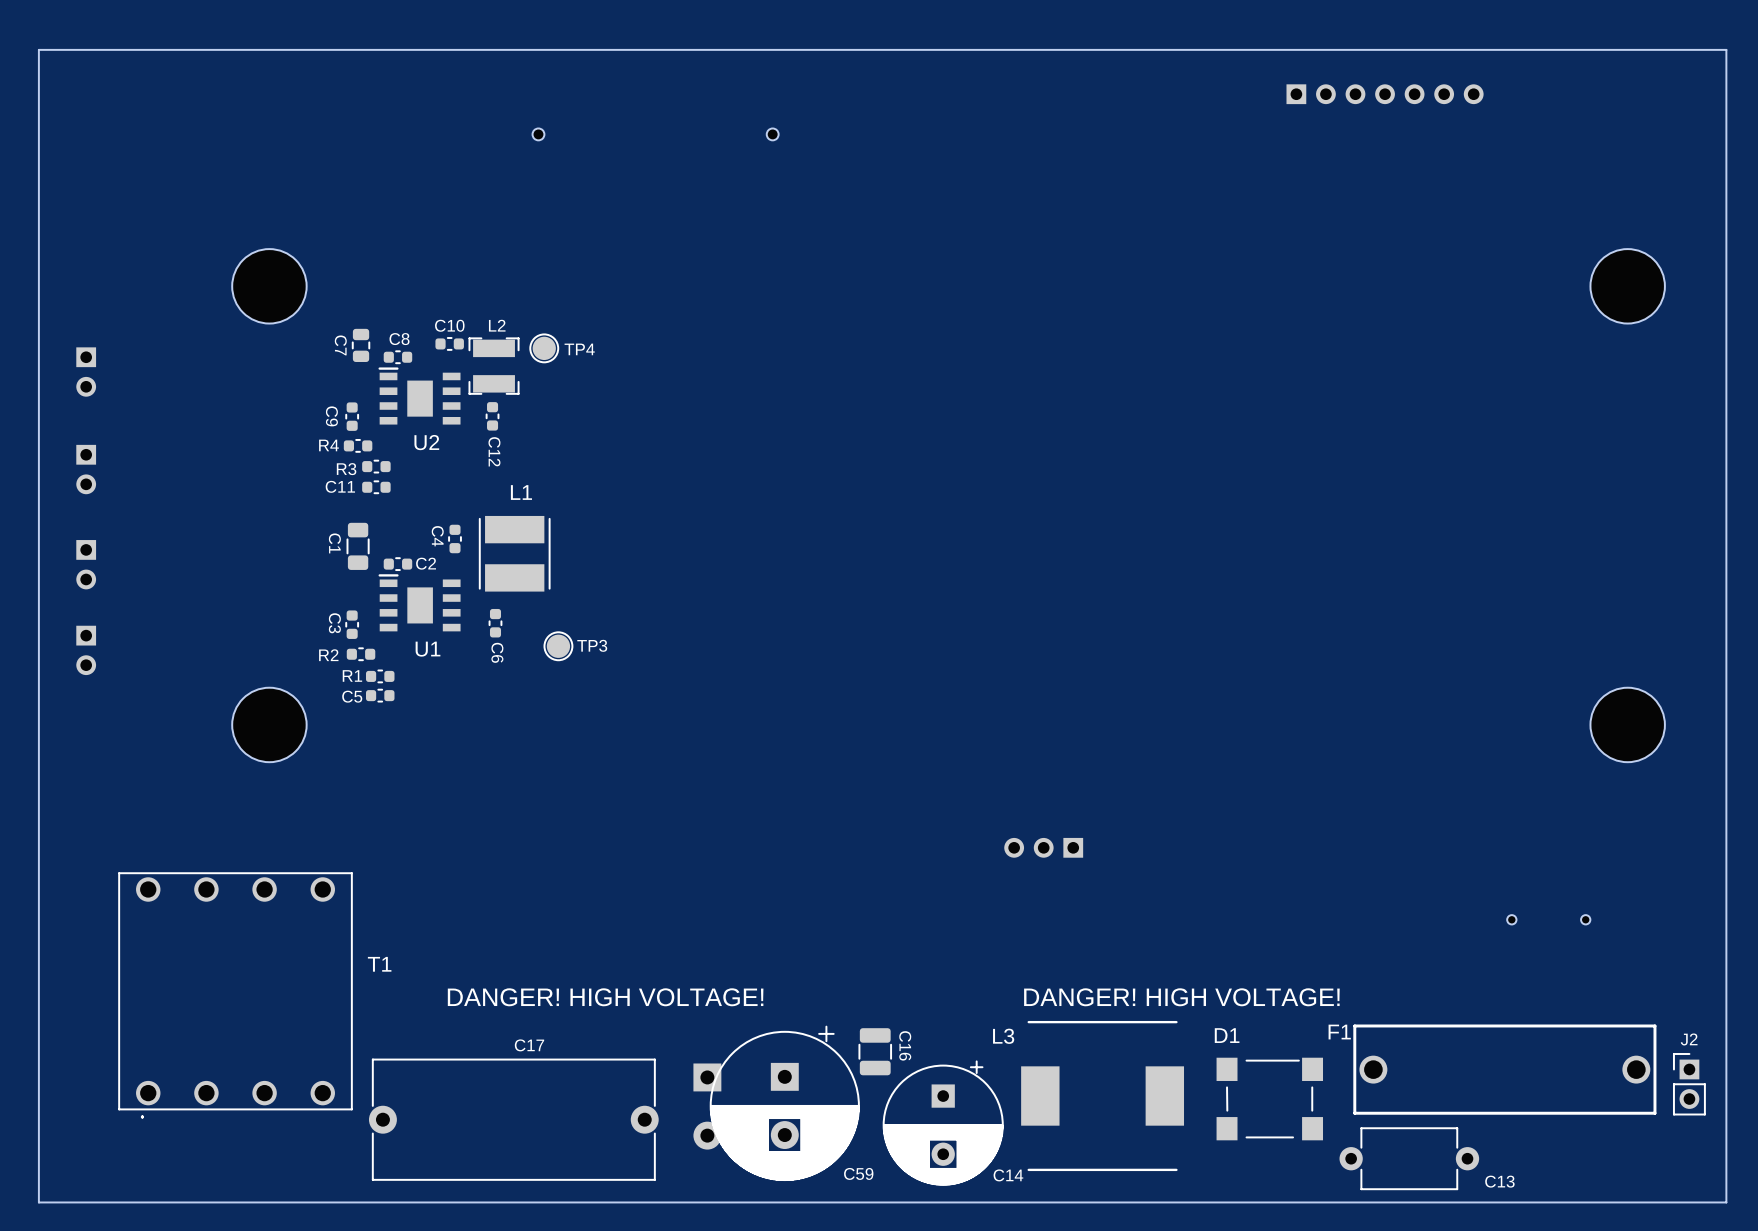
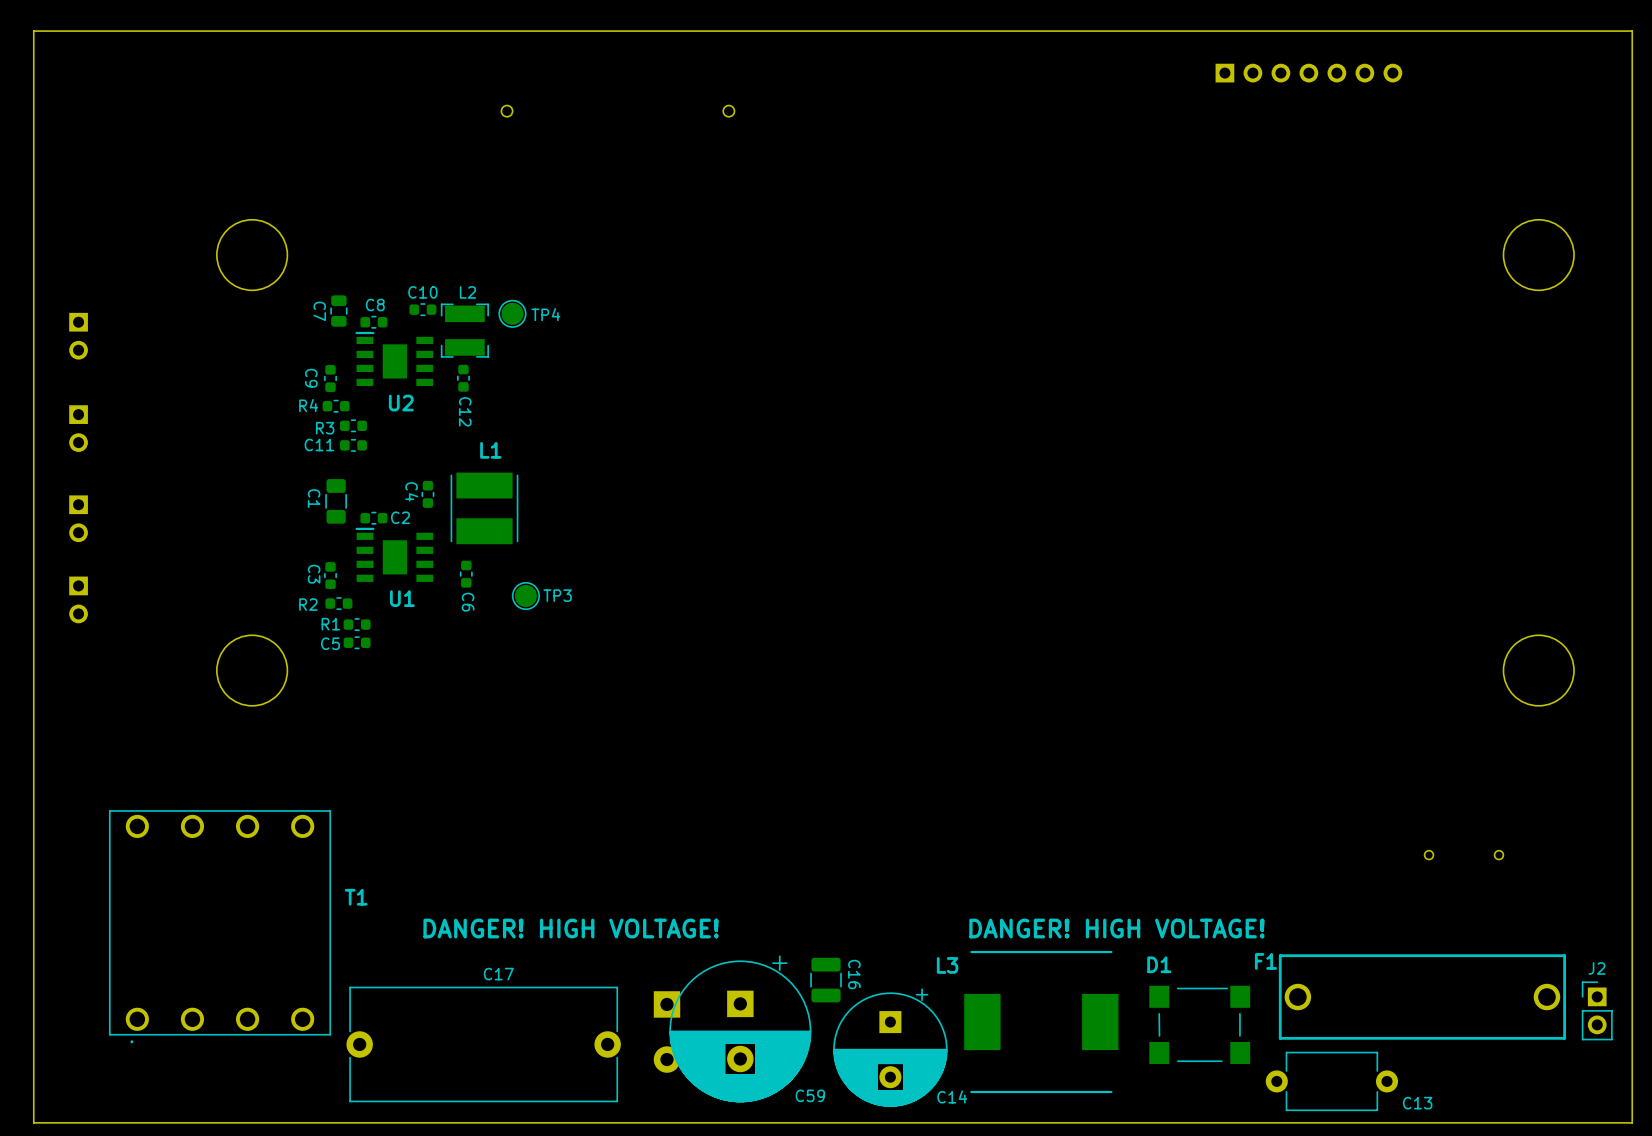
part: (1043, 847) -> none

